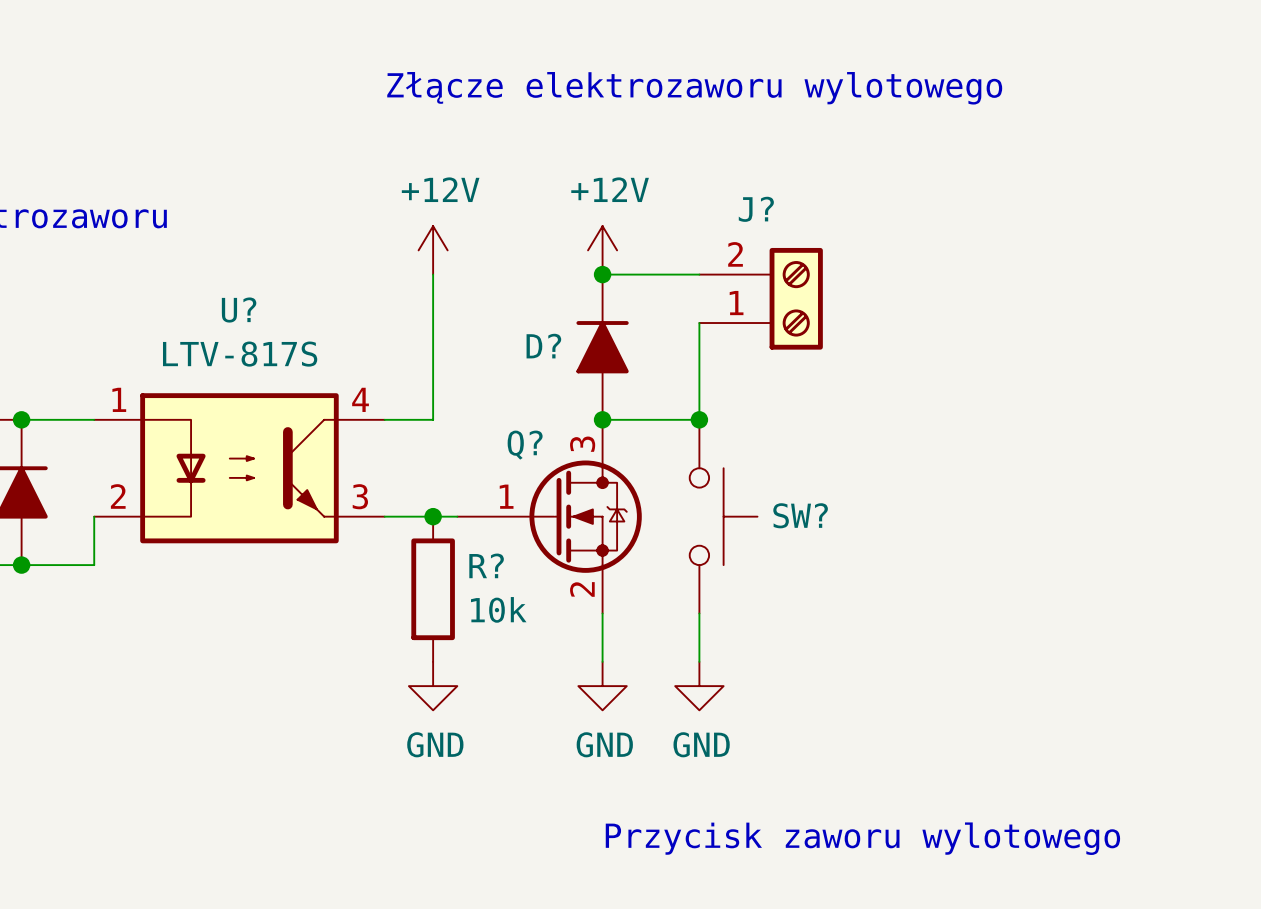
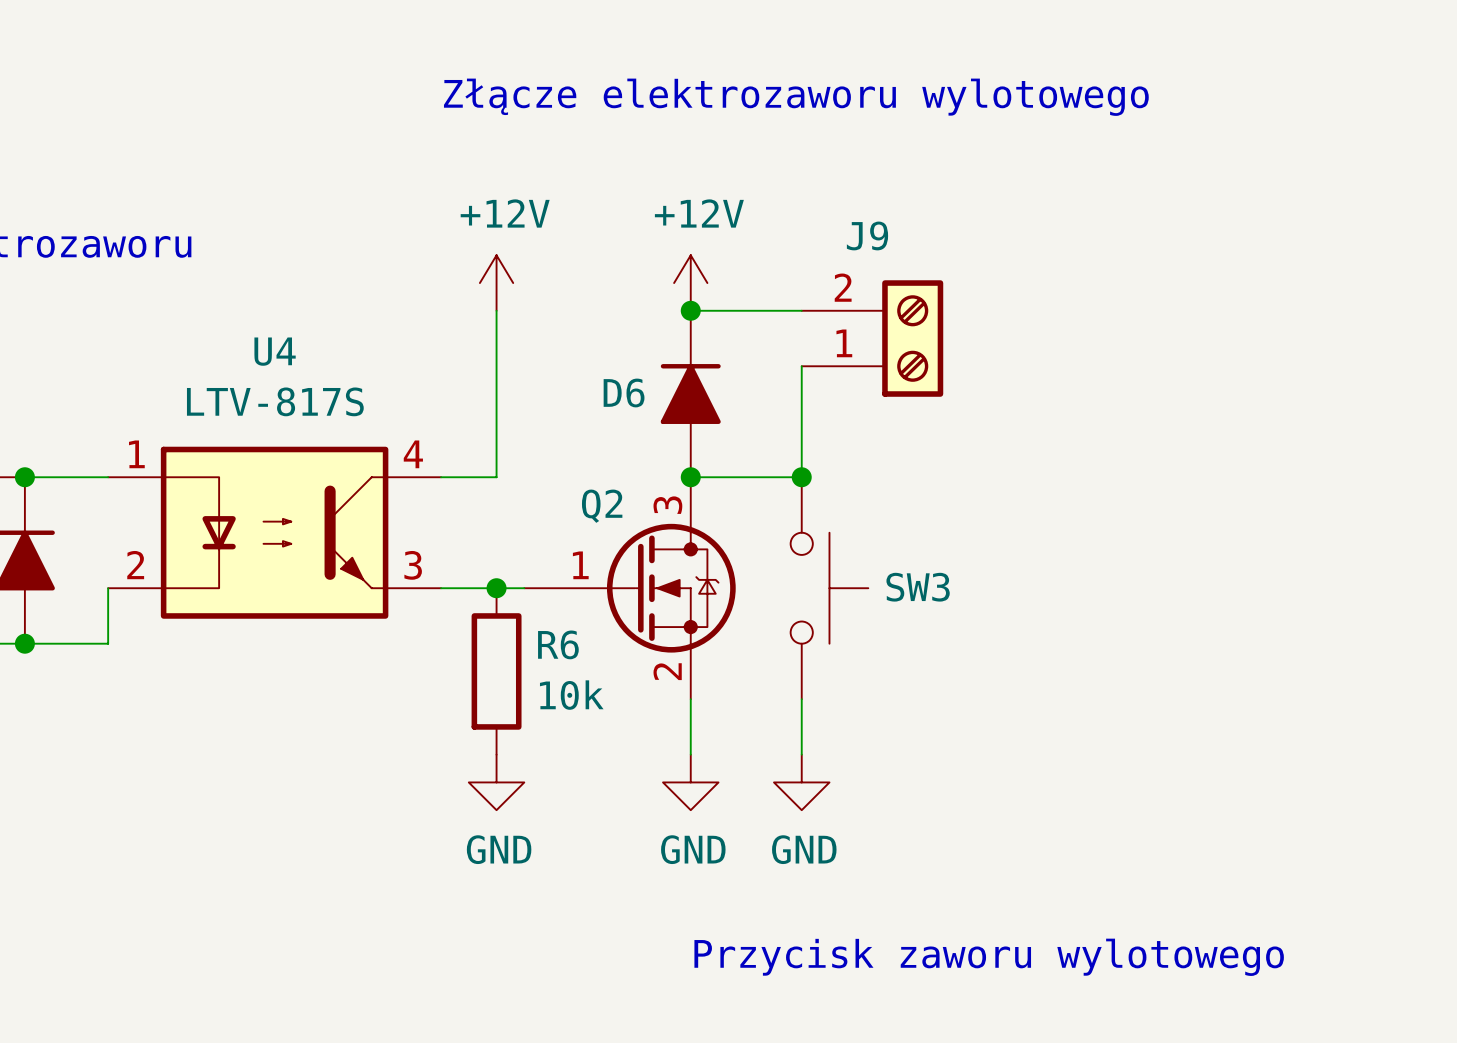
J? name: J? (756, 209) -> J9 (867, 235)
U? name: U? (239, 310) -> U4 (275, 351)
D? name: D? (543, 346) -> D6 (624, 392)
Q? name: Q? (525, 445) -> Q2 (602, 506)
SW? name: SW? (800, 515) -> SW3 (918, 587)
R? name: R? (486, 565) -> R6 (558, 644)

